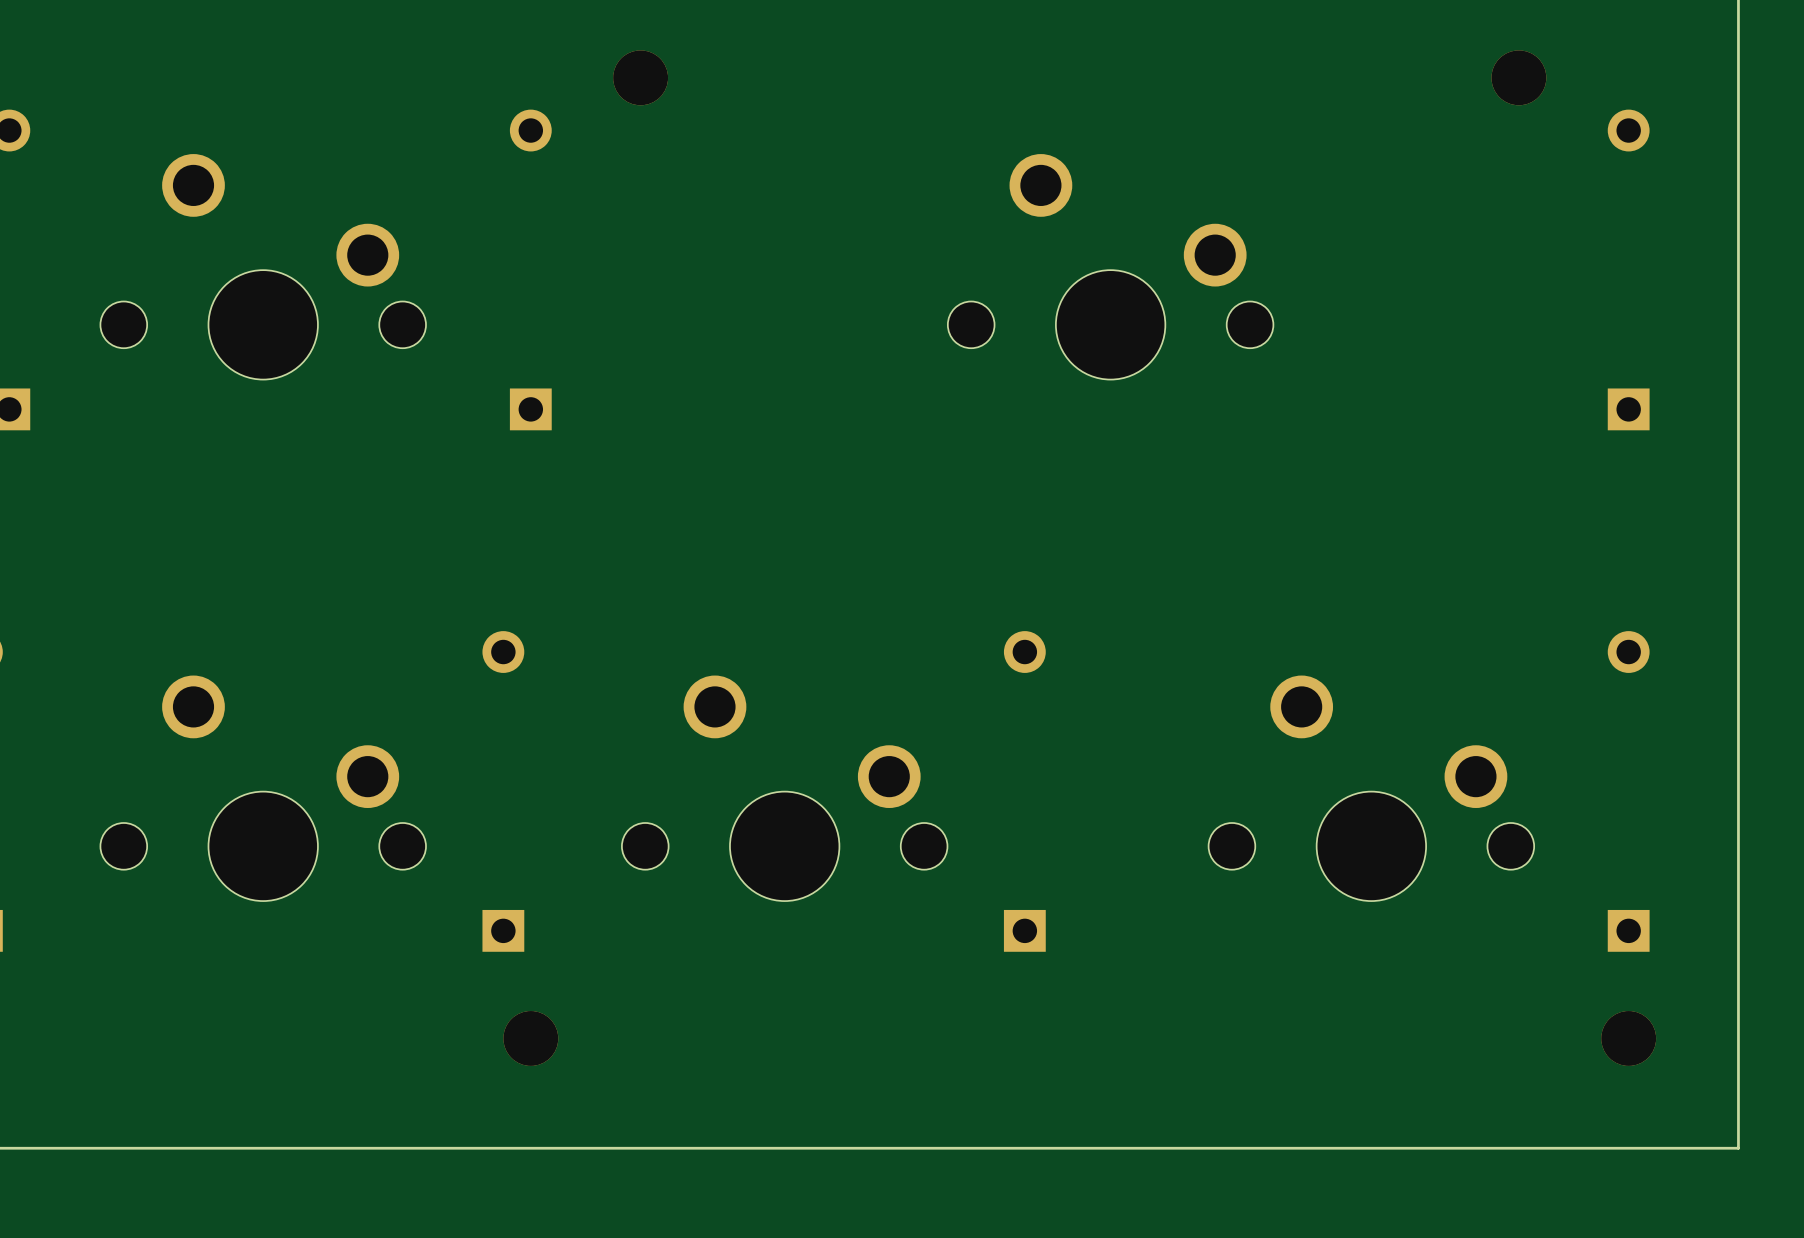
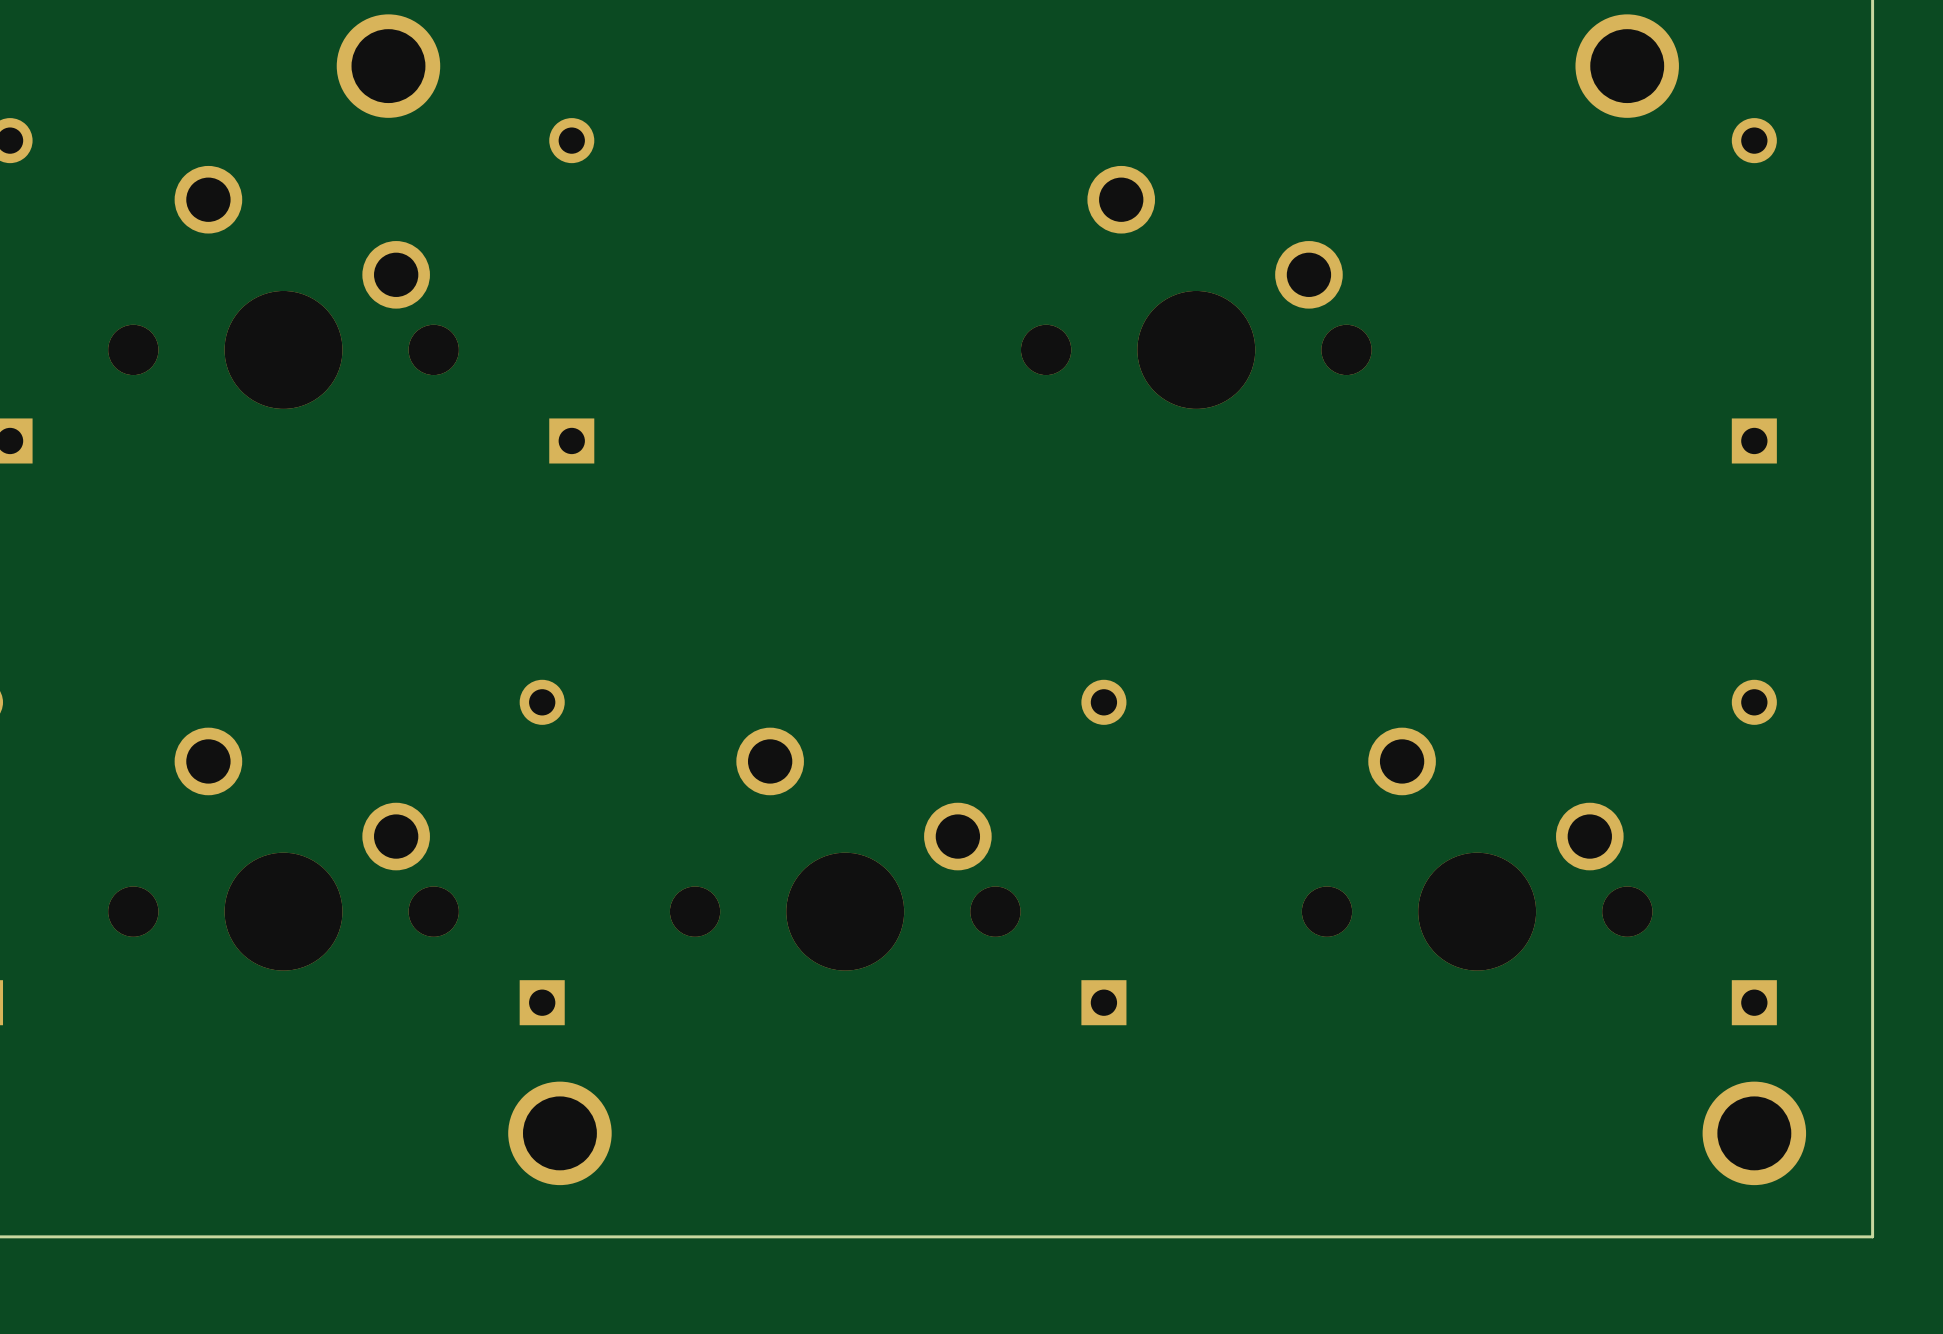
part footprint: [1491, 50, 1547, 106] -> [1575, 14, 1679, 118]
part: none -> (388, 66)
part: (640, 77) -> none
part footprint: [100, 154, 426, 380] -> [108, 165, 459, 409]
part footprint: [947, 154, 1274, 380] -> [1020, 165, 1372, 409]
part footprint: [100, 675, 426, 902] -> [108, 727, 459, 971]
part footprint: [621, 675, 948, 902] -> [669, 727, 1021, 971]
part footprint: [1208, 675, 1535, 902] -> [1301, 727, 1653, 971]
part footprint: [503, 1011, 559, 1066] -> [508, 1081, 612, 1186]
part footprint: [1601, 1011, 1657, 1066] -> [1702, 1081, 1807, 1186]

